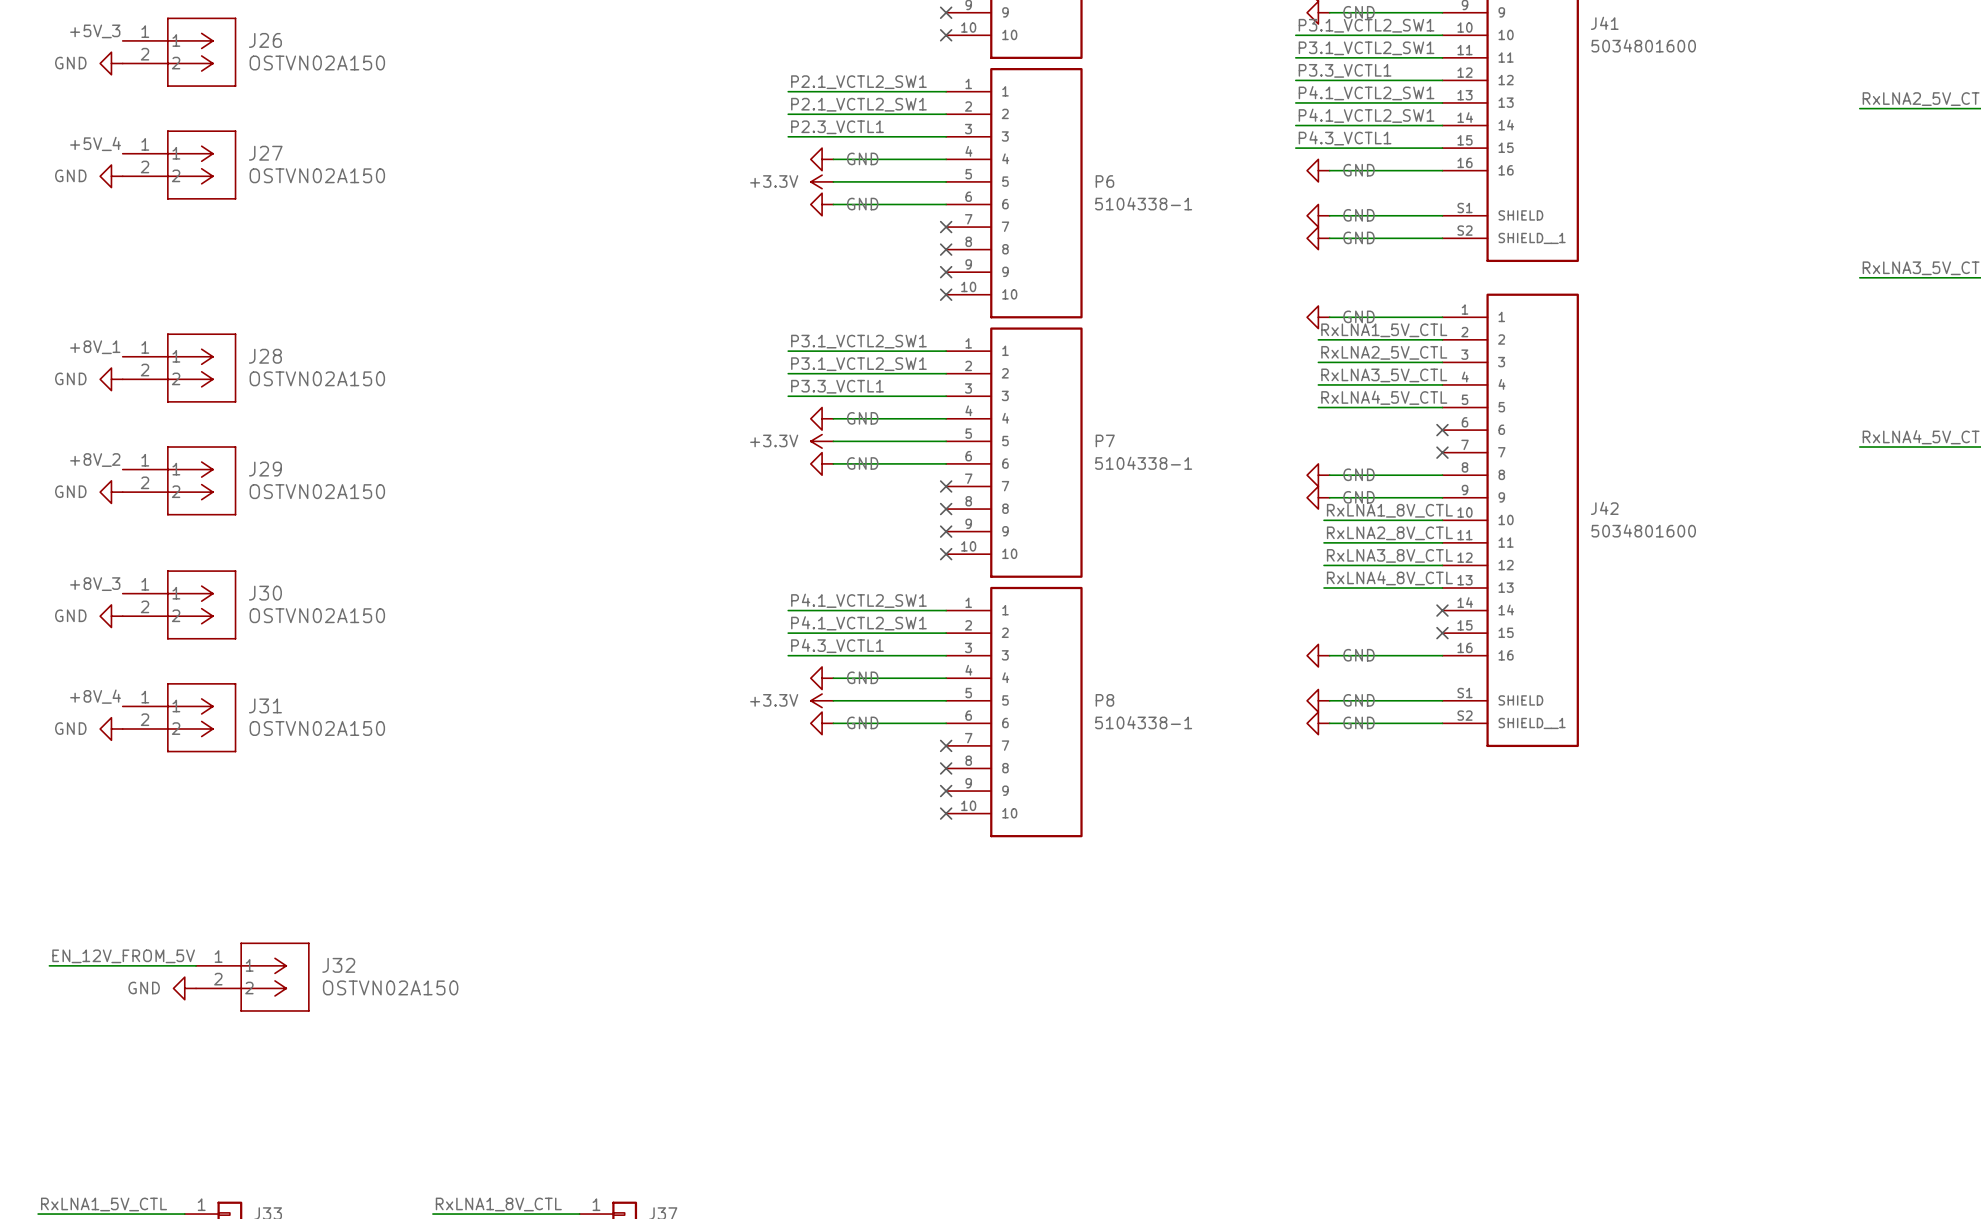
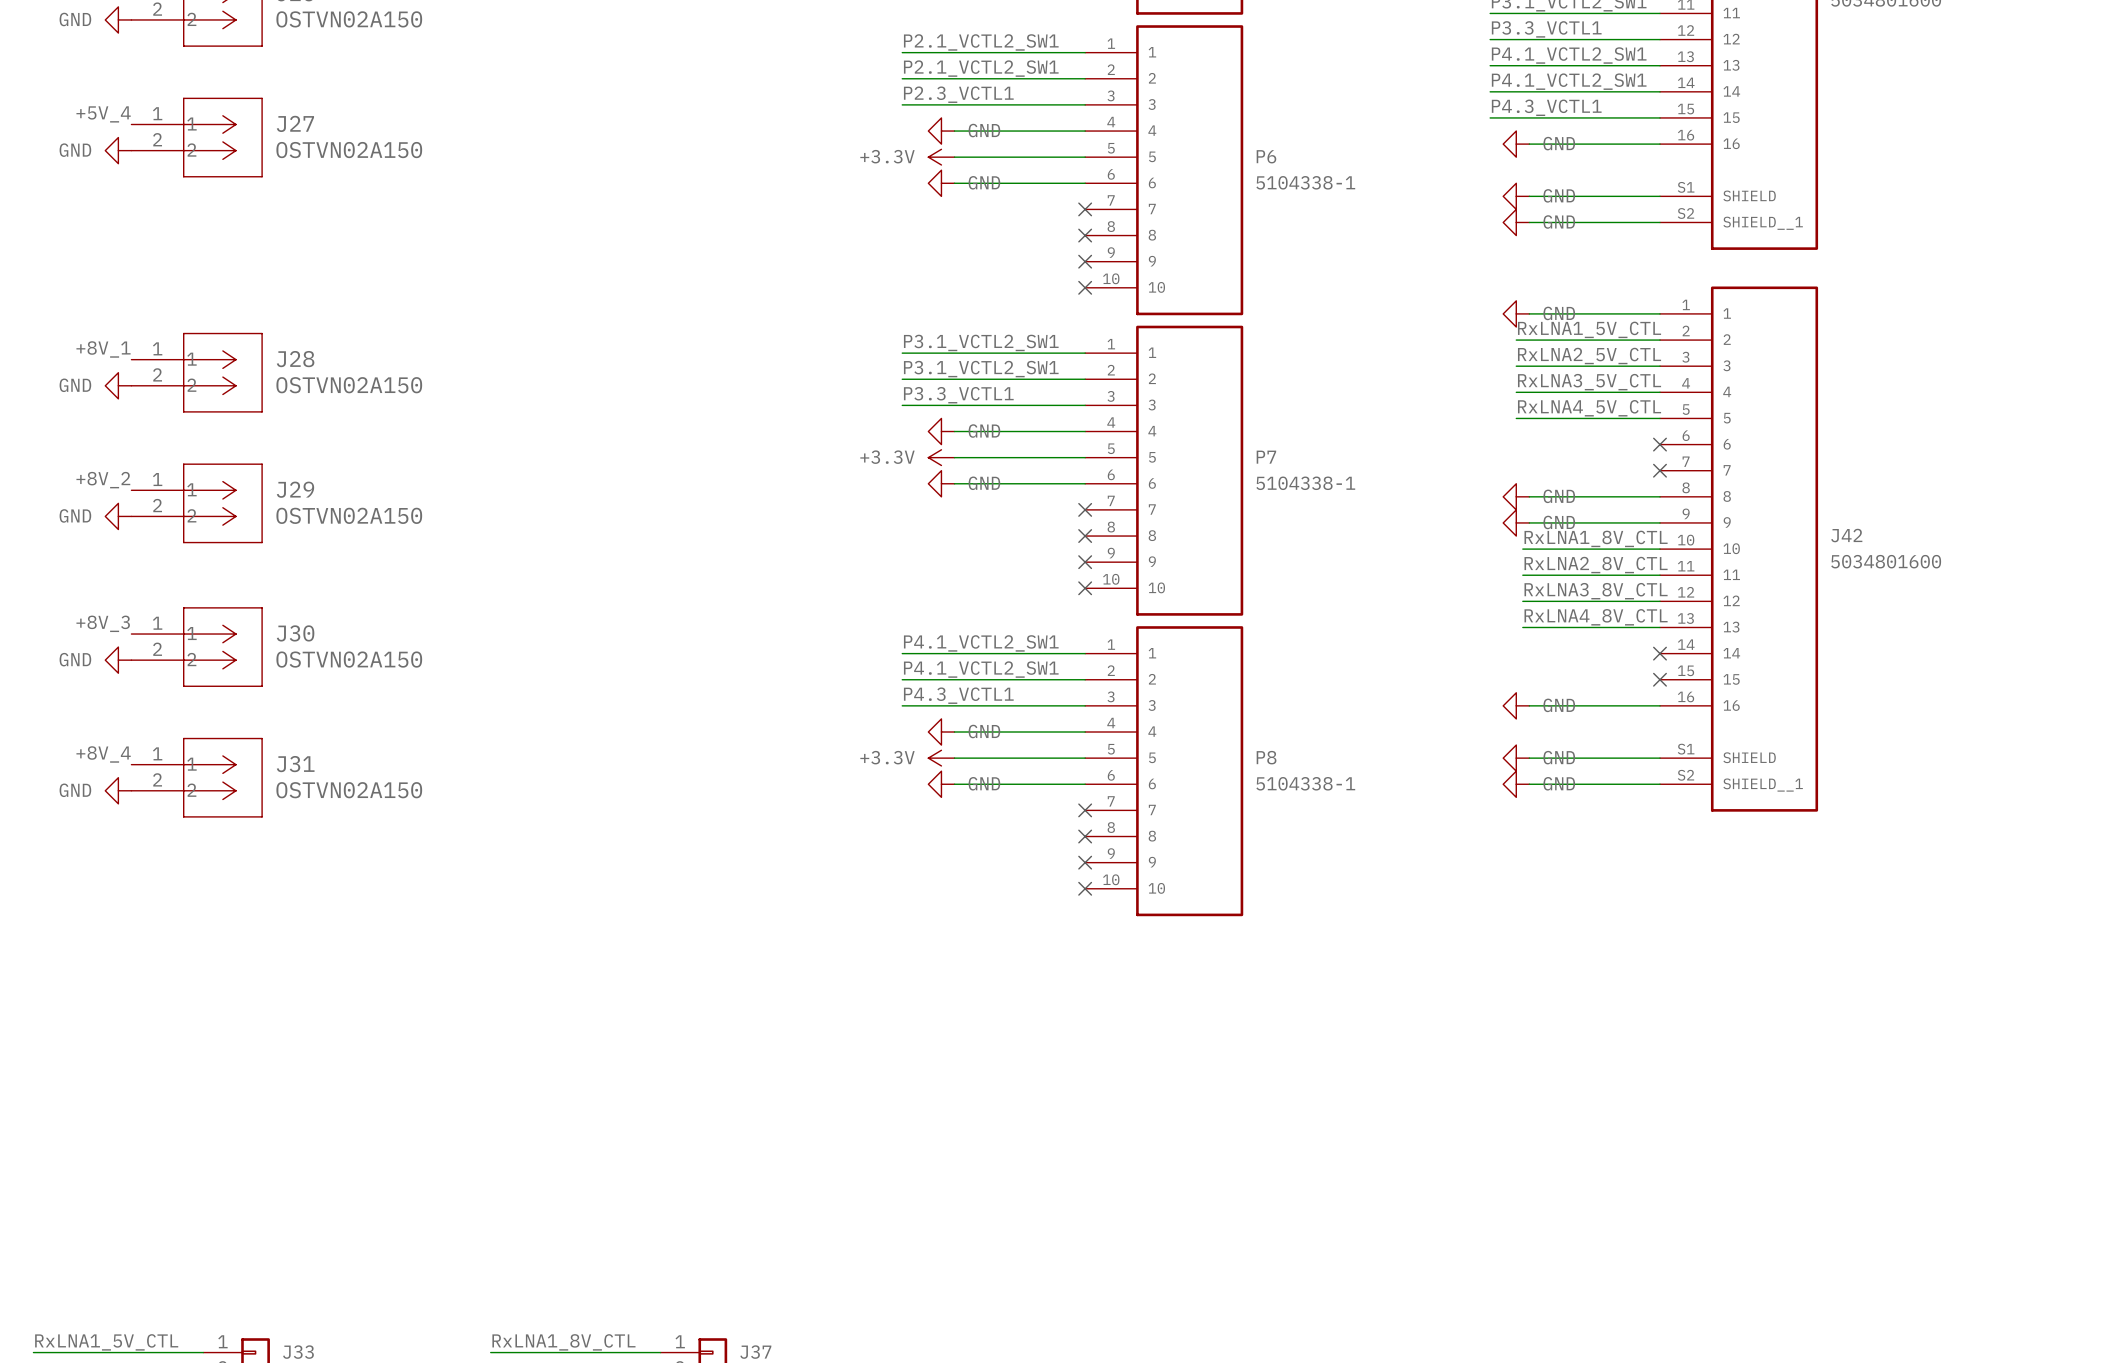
label: EN_12V_FROM_5V (123, 956) -> none
wire: (49, 965) (196, 965) -> none
J32: OSTVN02A150 (252, 977) -> none
power symbol: GND (184, 988) -> none

